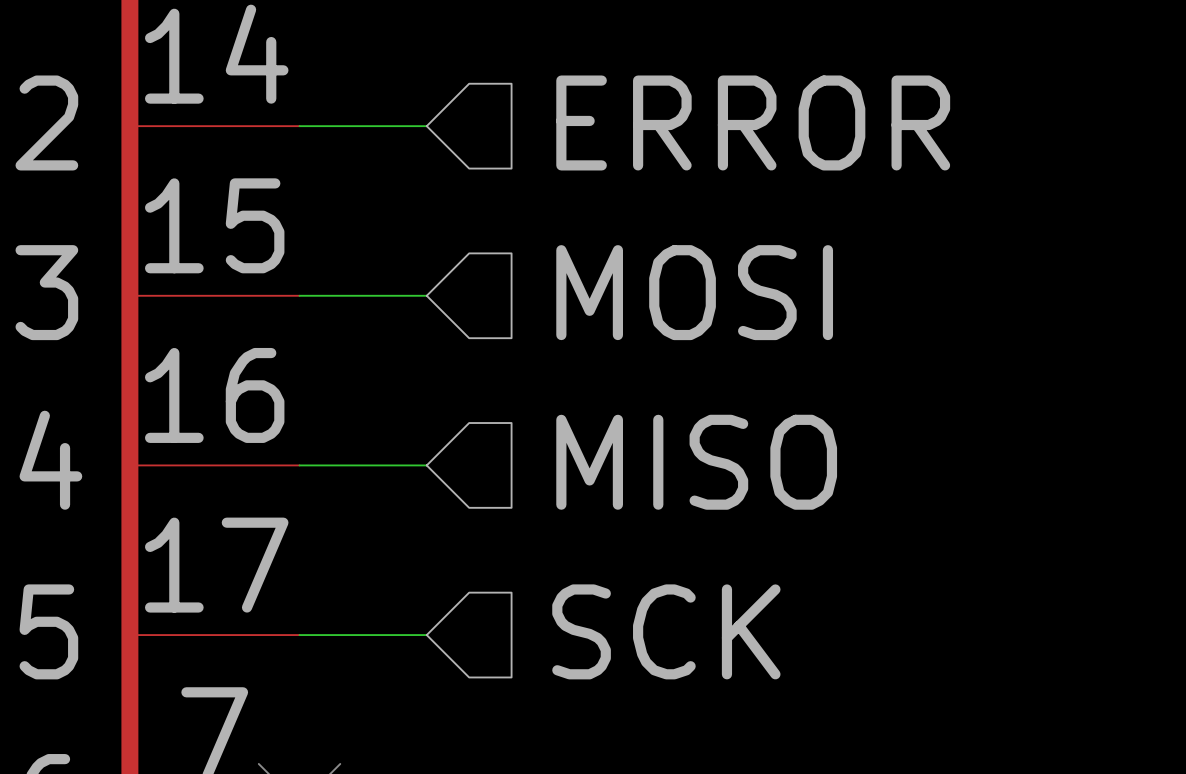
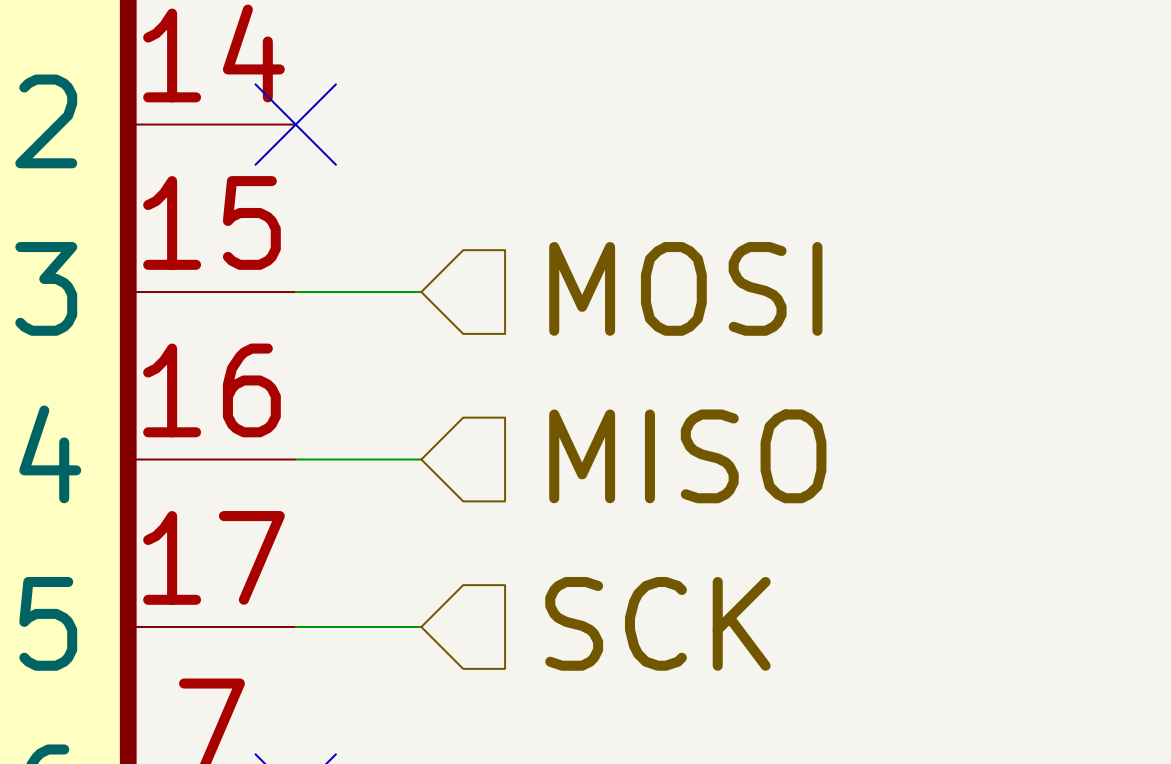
hierarchical label: ERROR (753, 122) -> none
wire: (299, 126) (426, 126) -> none
no-connect mark: none -> (295, 124)

